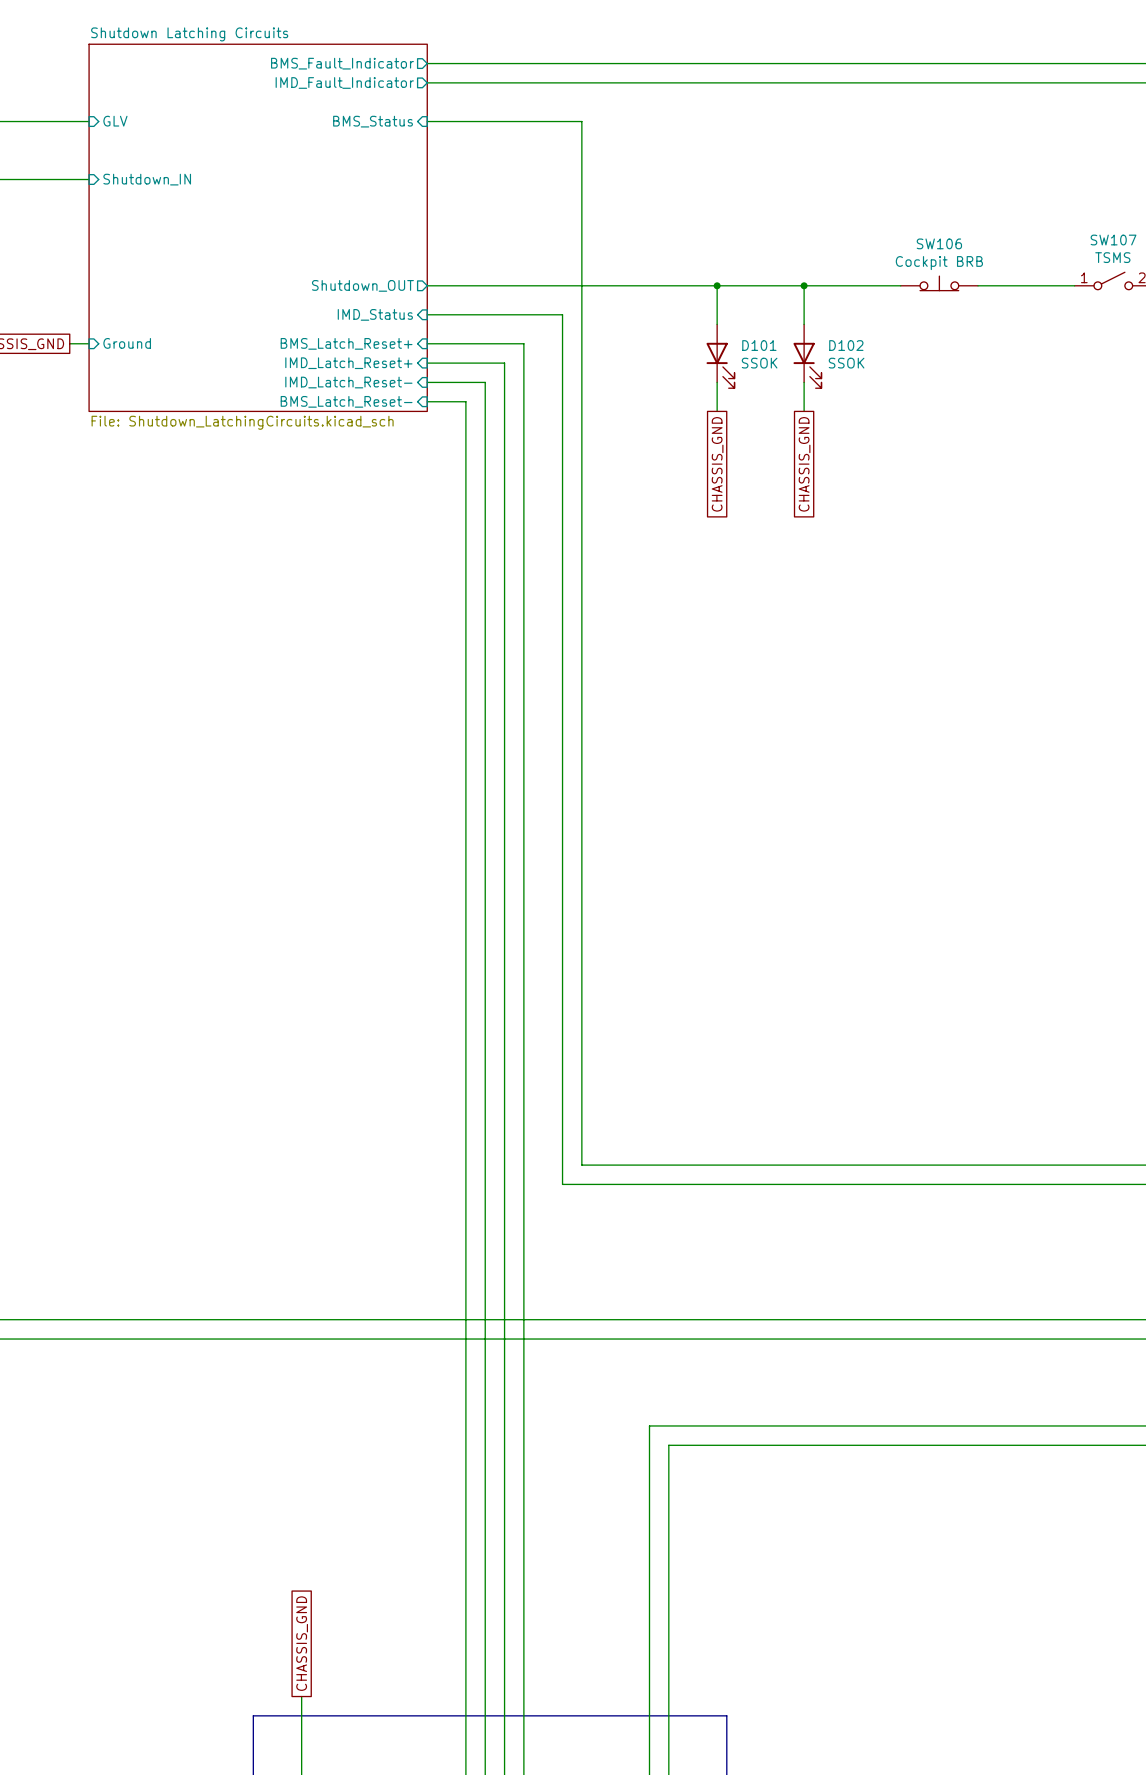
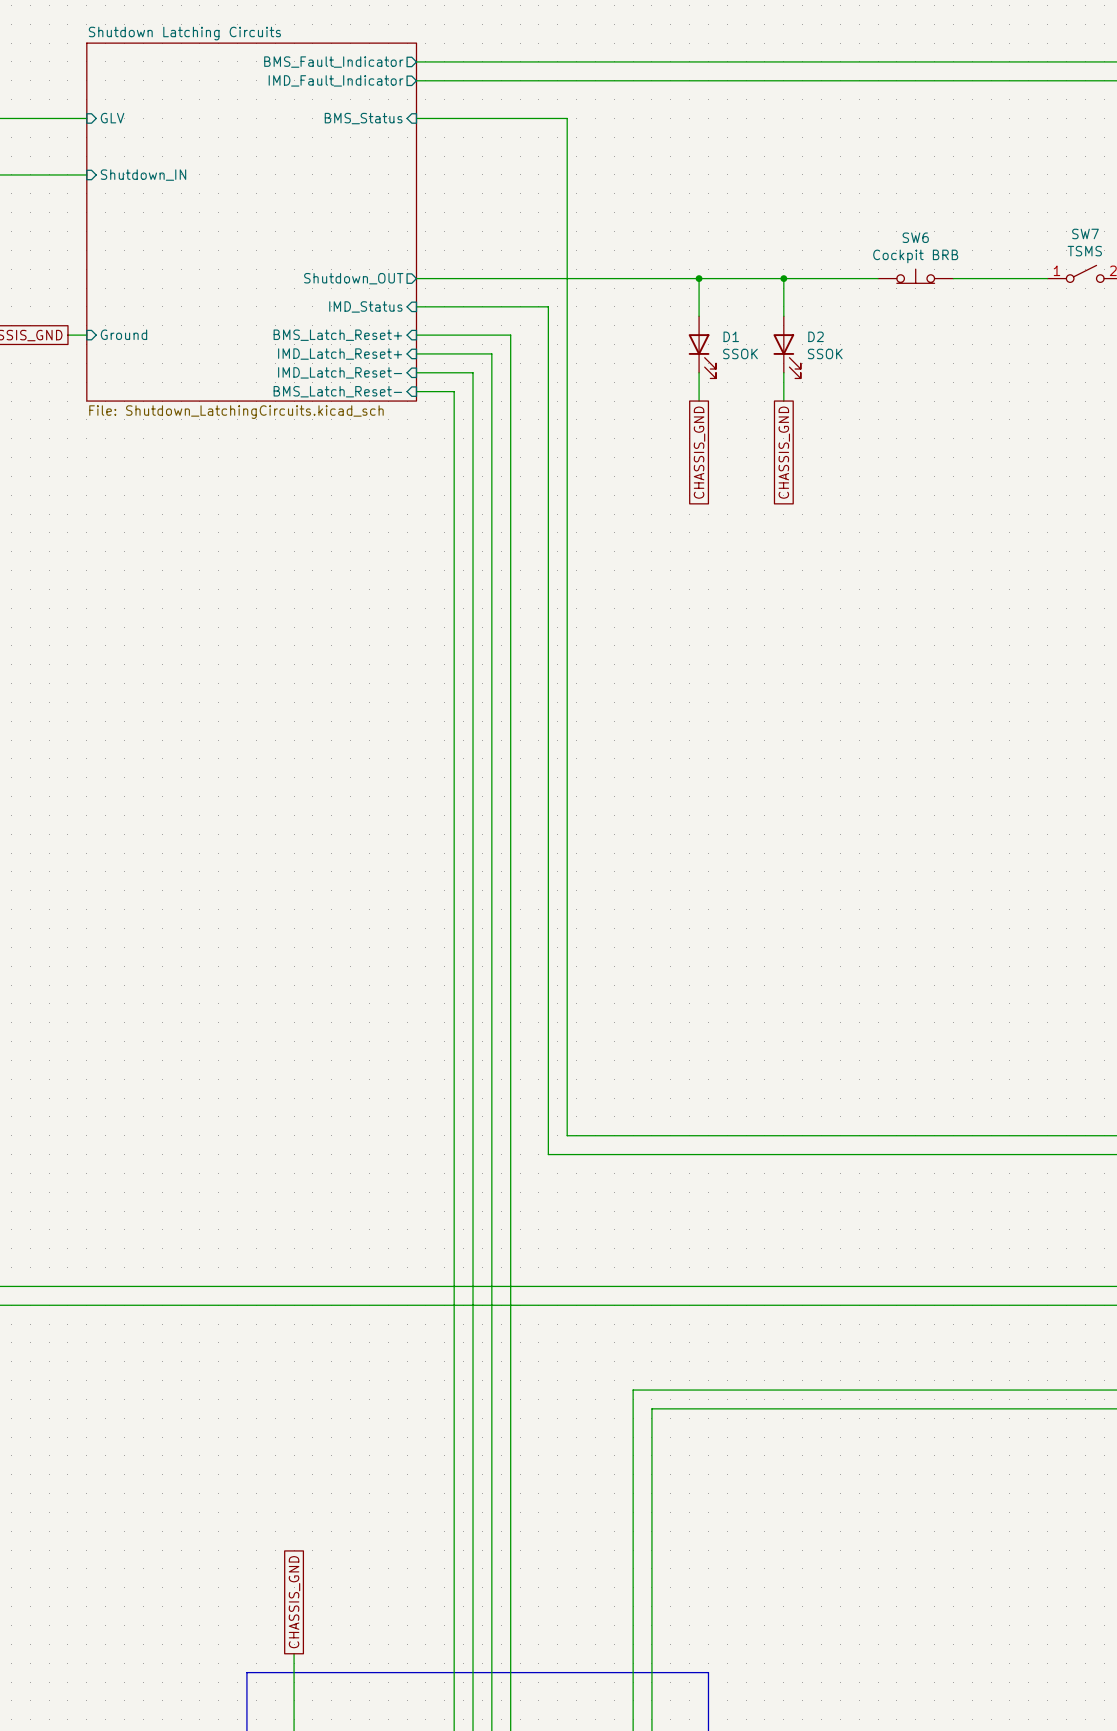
SW107 name: SW107 (1113, 240) -> SW7 (1085, 233)
SW106 name: SW106 (939, 243) -> SW6 (915, 237)
D101 name: D101 (759, 345) -> D1 (731, 336)
D102 name: D102 (846, 345) -> D2 (816, 336)

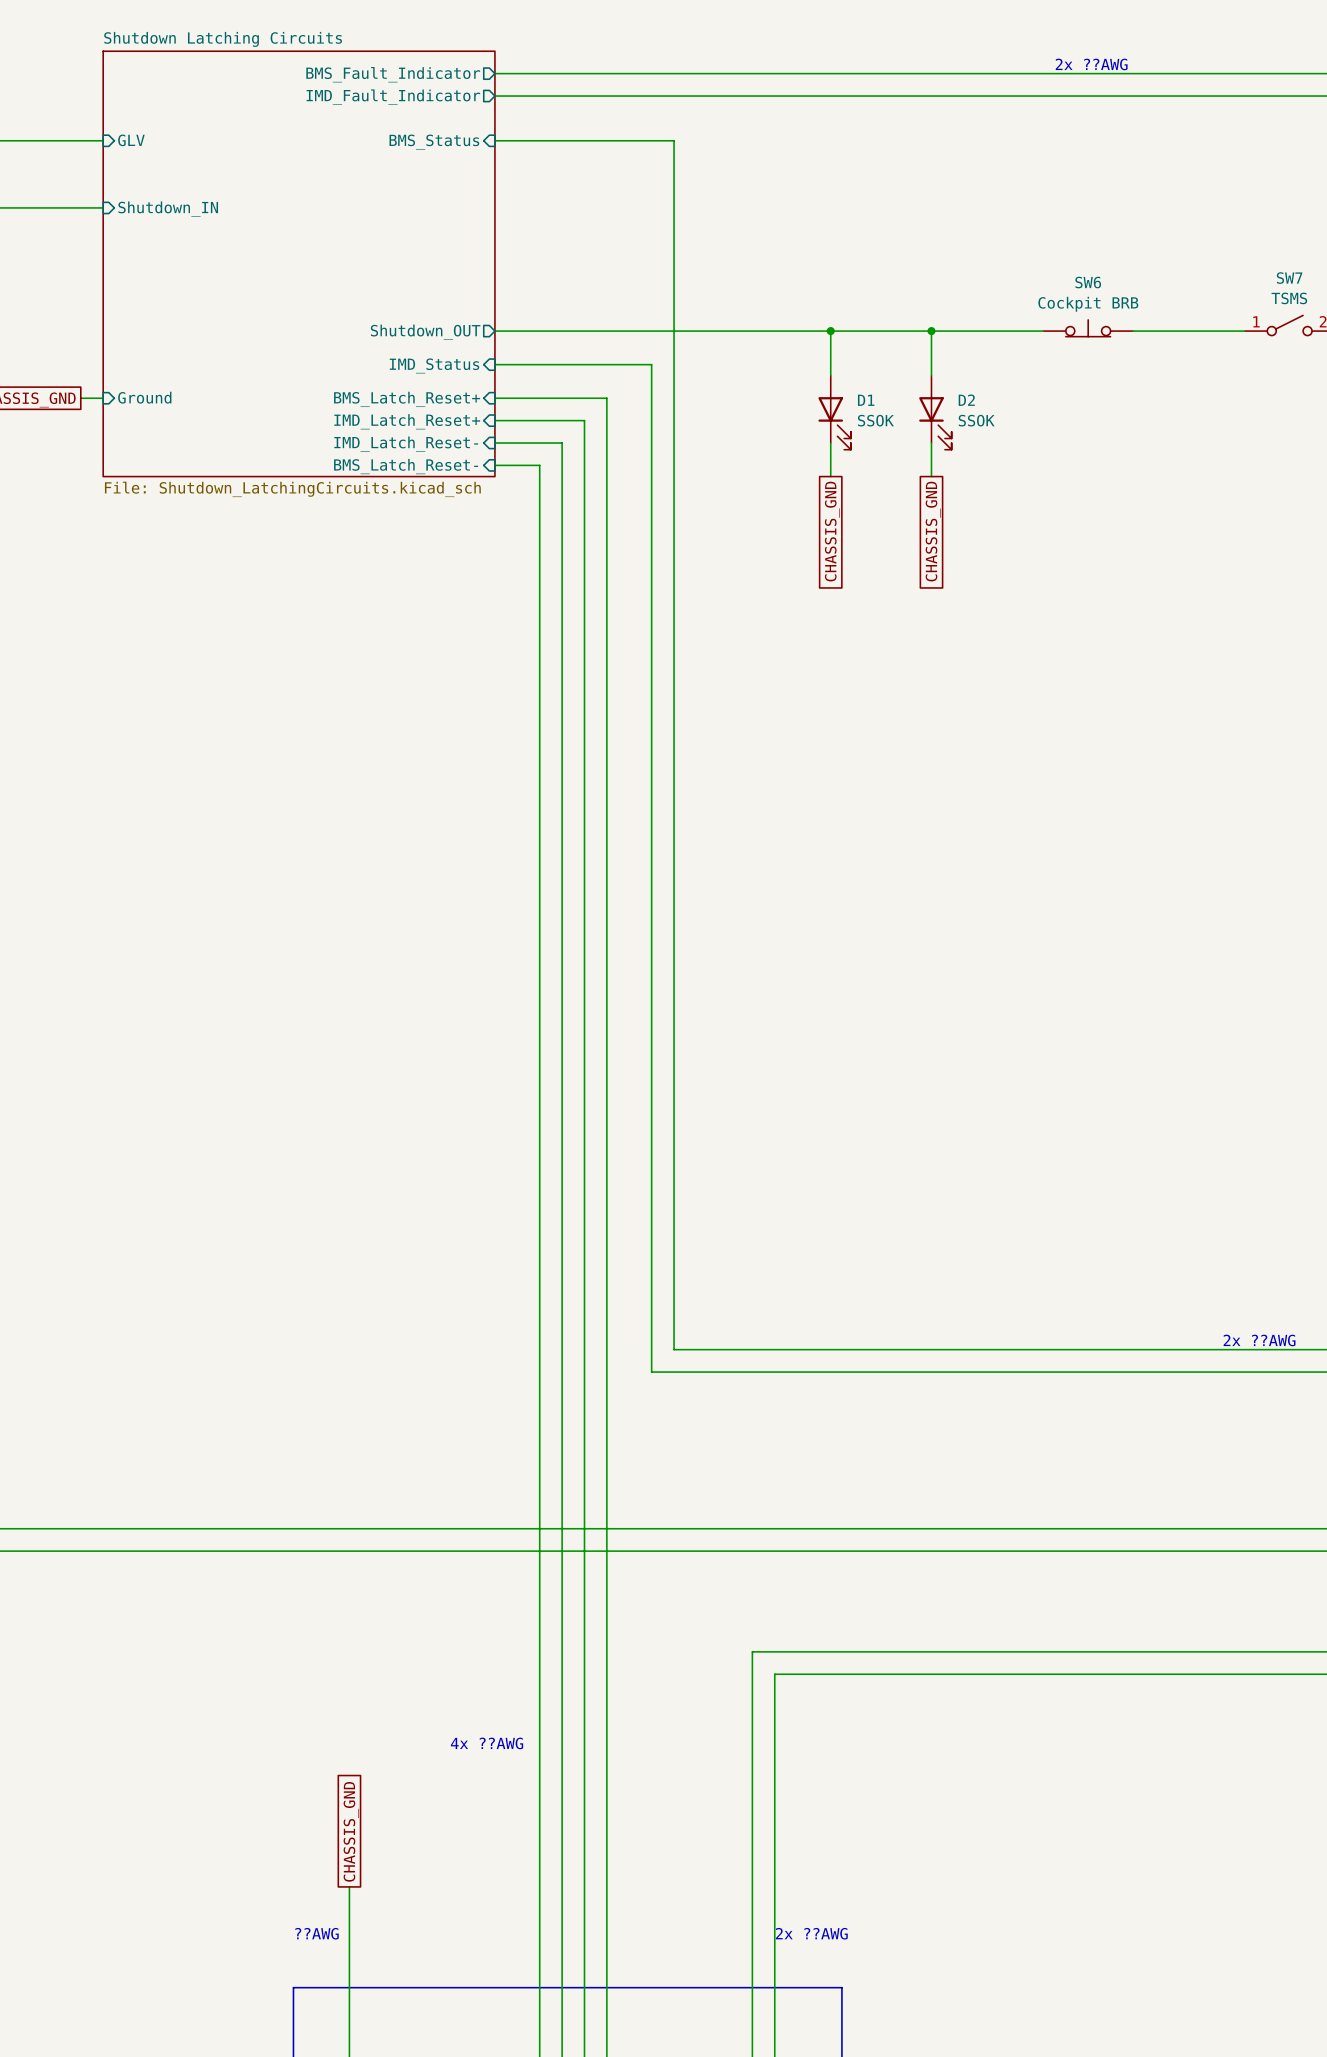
text: none -> 2x ??AWG (1091, 64)
text: none -> 2x ??AWG (1259, 1340)
text: none -> 4x ??AWG (487, 1743)
wire: none -> (349, 1886) (349, 1965)
global label position: CHASSIS_GND (294, 1602) -> CHASSIS_GND (351, 1831)
text: none -> ??AWG (317, 1933)
text: none -> 2x ??AWG (811, 1933)

